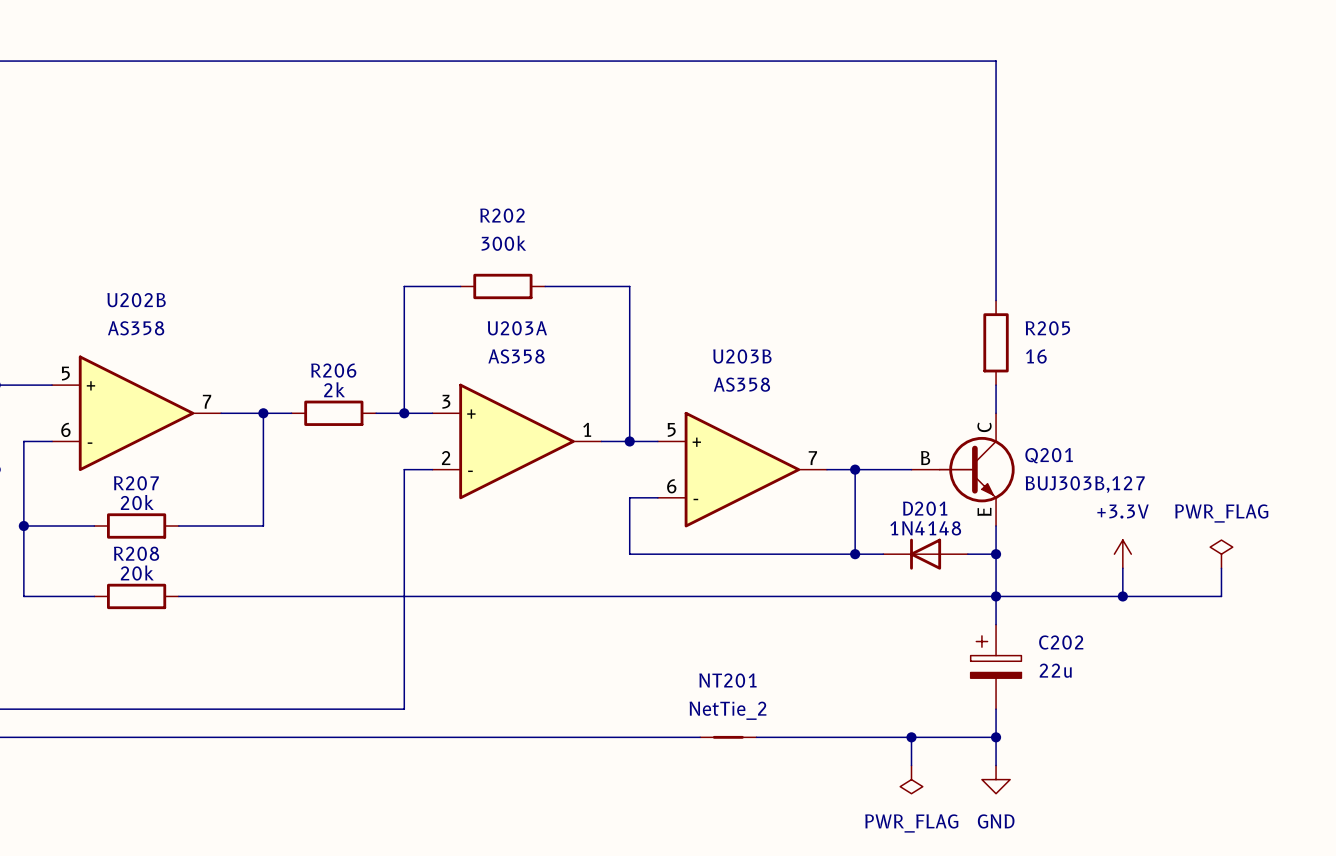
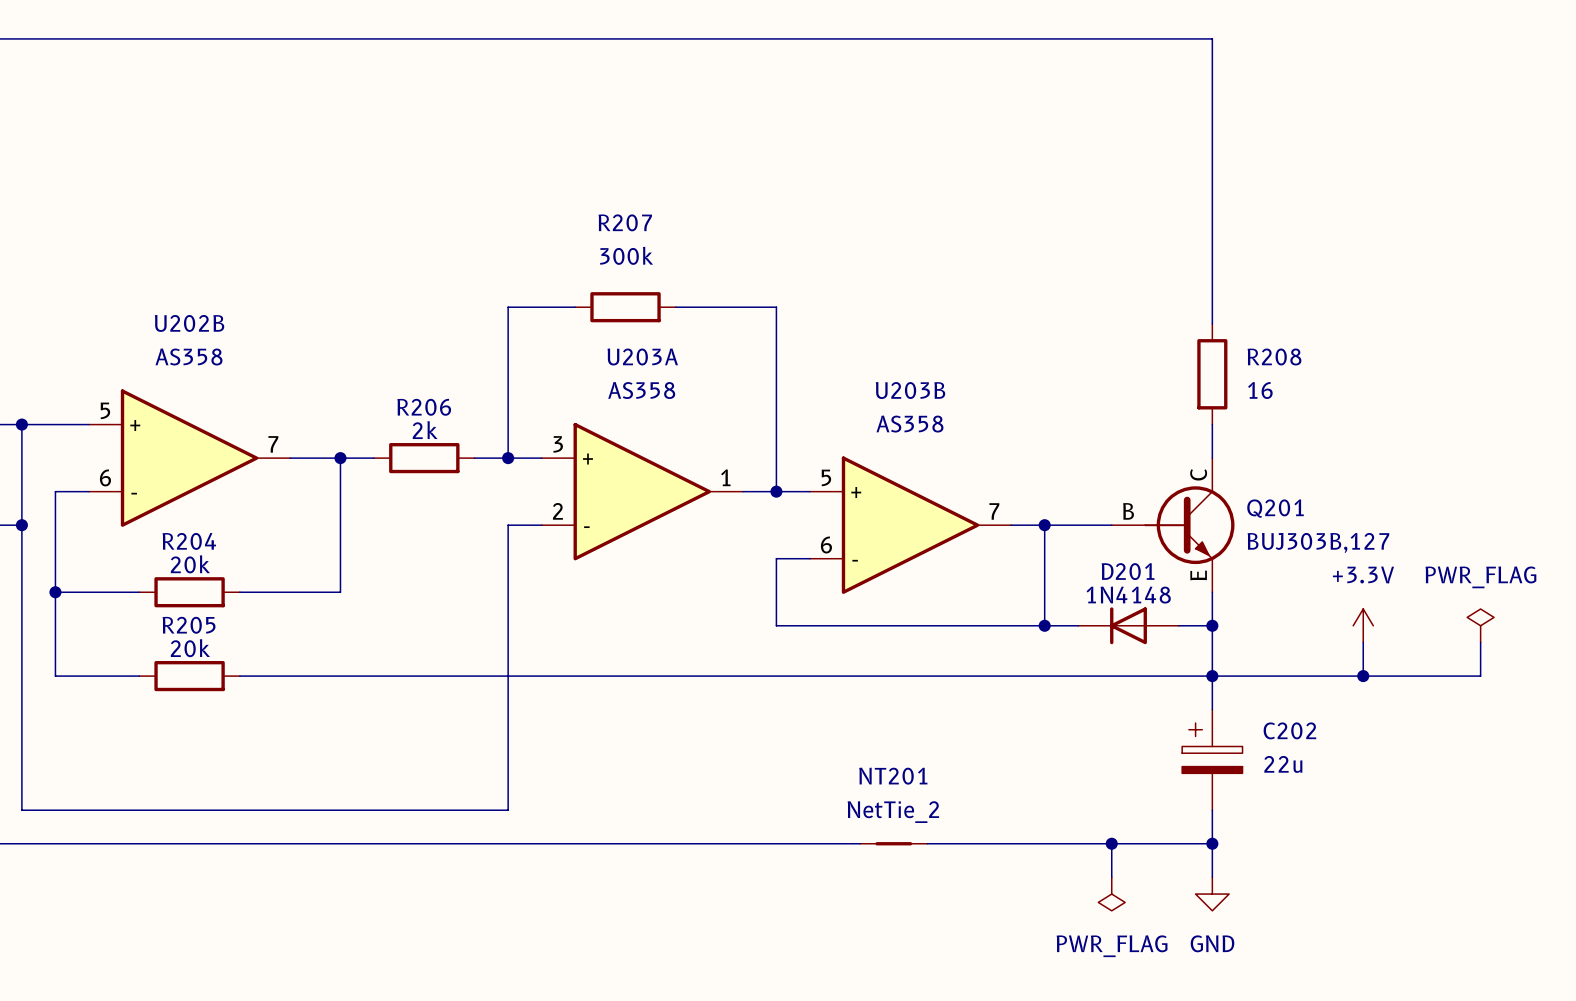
R202 name: R202 (502, 215) -> R207 (625, 222)
R205 name: R205 (1047, 328) -> R208 (1274, 356)
R207 name: R207 (136, 483) -> R204 (189, 541)
R208 name: R208 (136, 553) -> R205 (189, 625)

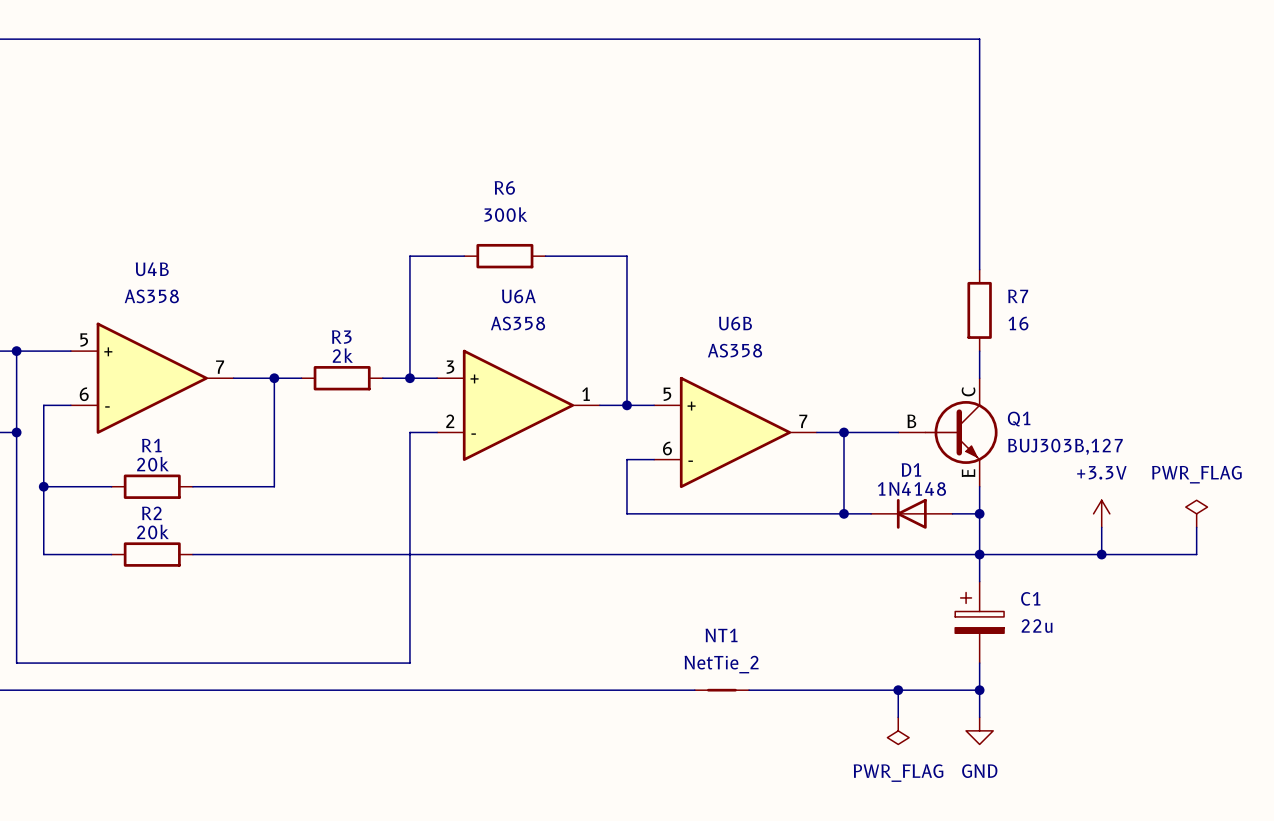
R207 name: R207 (625, 222) -> R6 (504, 187)
U202B name: U202B (189, 323) -> U4B (152, 269)
U203A name: U203A (642, 356) -> U6A (518, 296)
R208 name: R208 (1274, 356) -> R7 (1018, 296)
U203B name: U203B (910, 390) -> U6B (735, 323)
R206 name: R206 (424, 407) -> R3 (341, 337)
Q201 name: Q201 (1275, 508) -> Q1 (1019, 419)
R204 name: R204 (189, 541) -> R1 (151, 445)
D201 name: D201 (1128, 571) -> D1 (911, 469)
R205 name: R205 (189, 625) -> R2 (151, 513)
C202 name: C202 (1289, 730) -> C1 (1030, 598)
NT201 name: NT201 (893, 776) -> NT1 (721, 635)

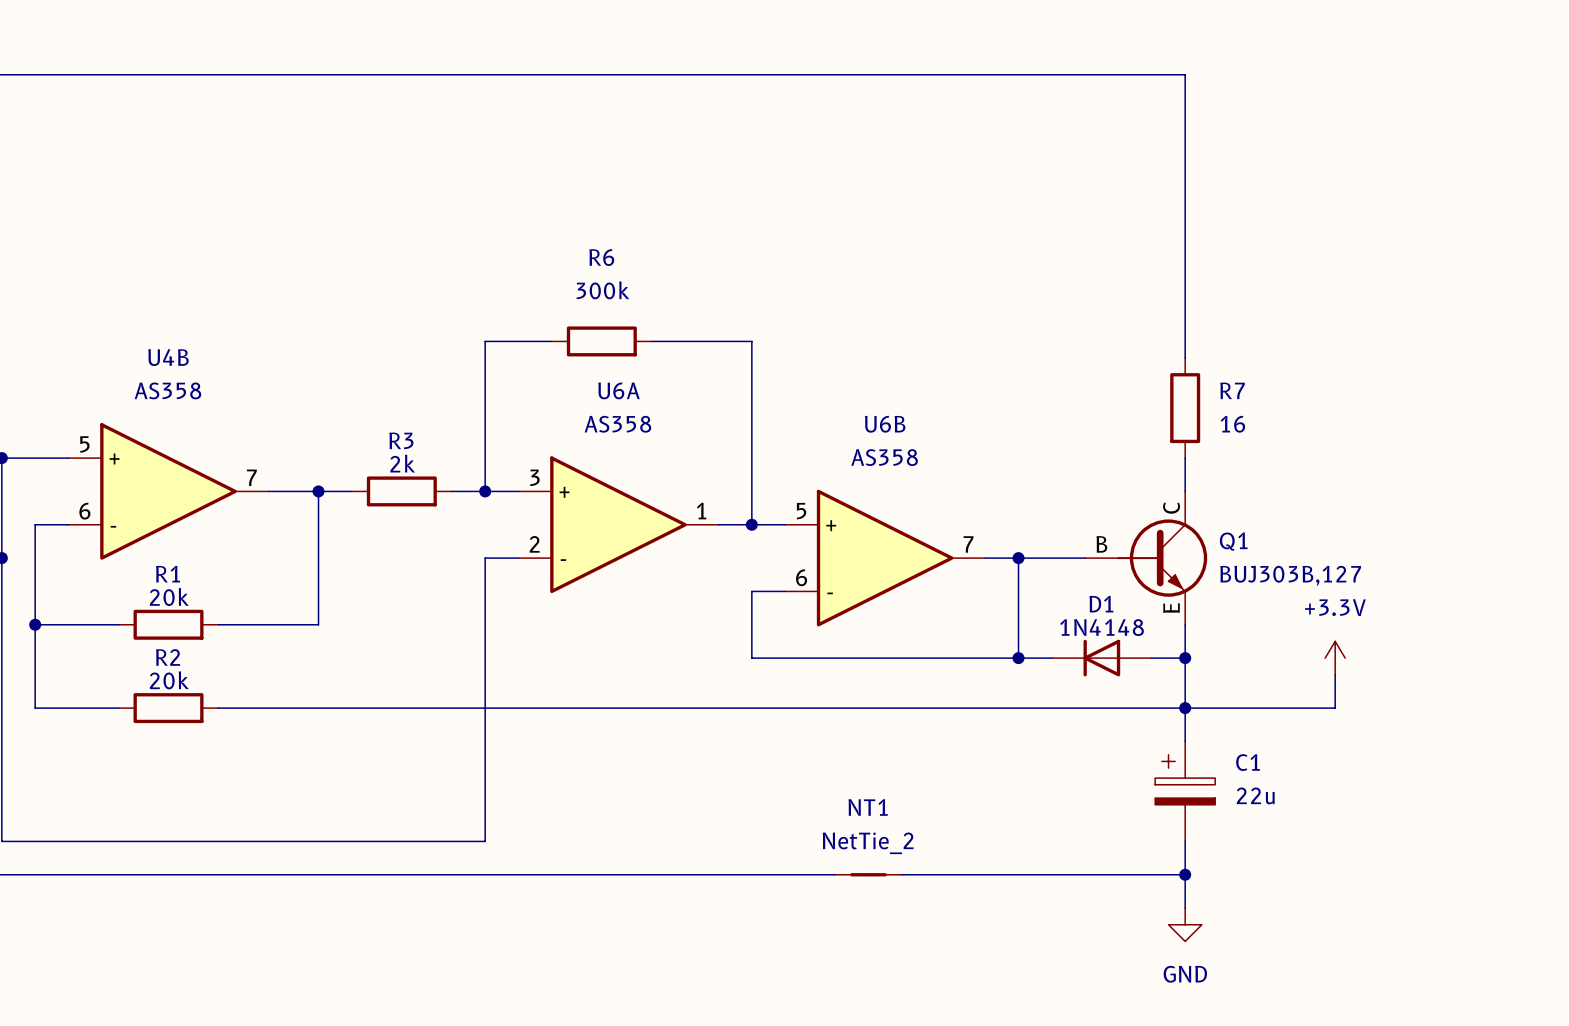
power symbol: PWR_FLAG (1196, 513) -> none
wire: (1196, 527) (1196, 554) (1101, 554) -> none
junction: (1101, 554) -> none
wire: (898, 690) (898, 717) -> none
junction: (898, 690) -> none
power symbol: PWR_FLAG (898, 730) -> none

